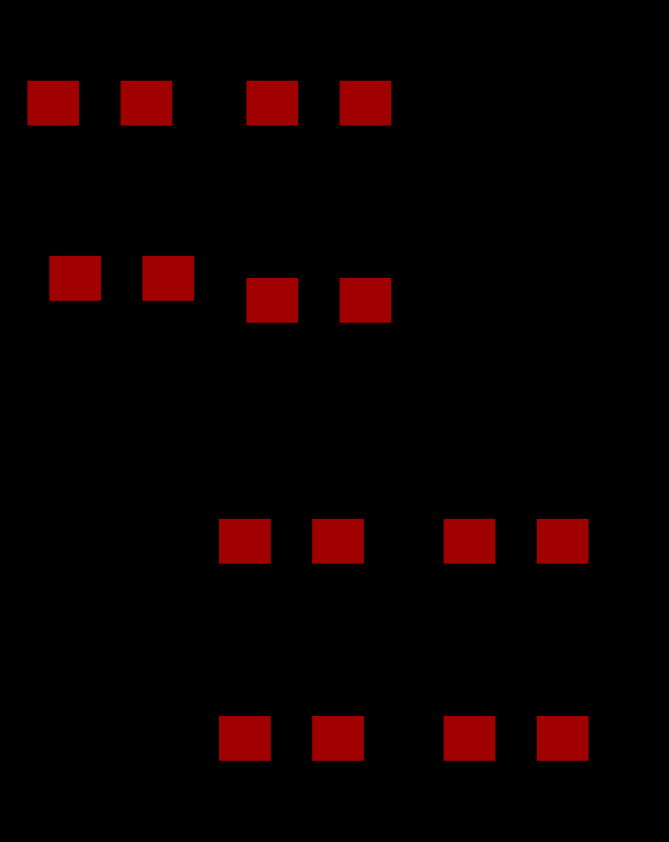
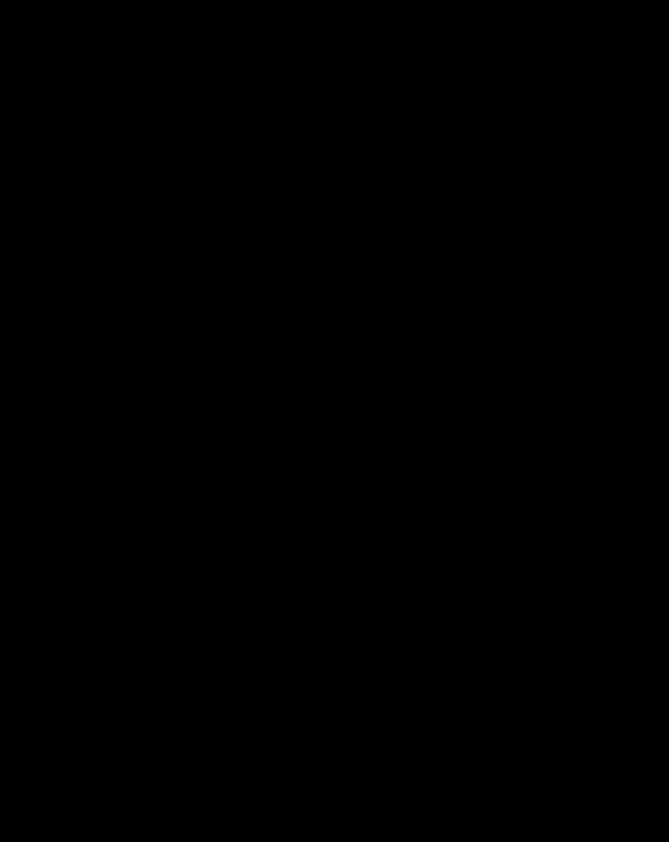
part: (99, 103) -> none
part: (318, 103) -> none
part: (121, 278) -> none
part: (318, 300) -> none
part: (291, 541) -> none
part: (516, 541) -> none
part: (291, 738) -> none
part: (516, 738) -> none

